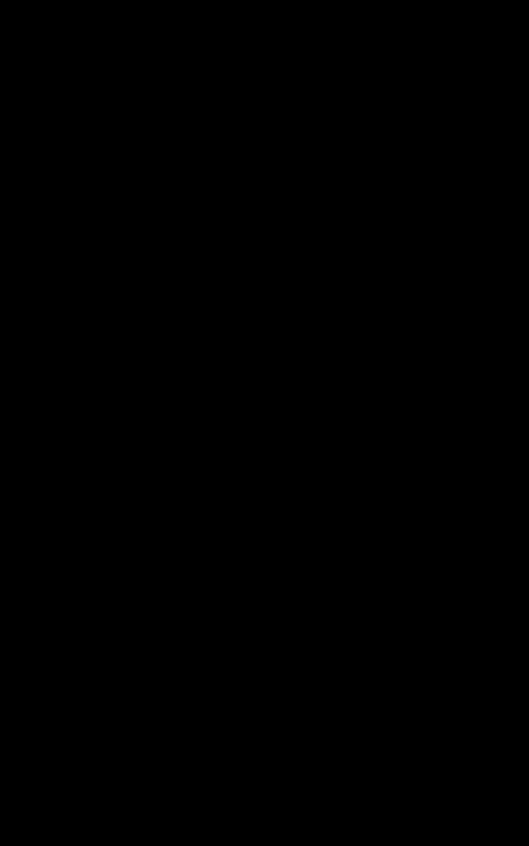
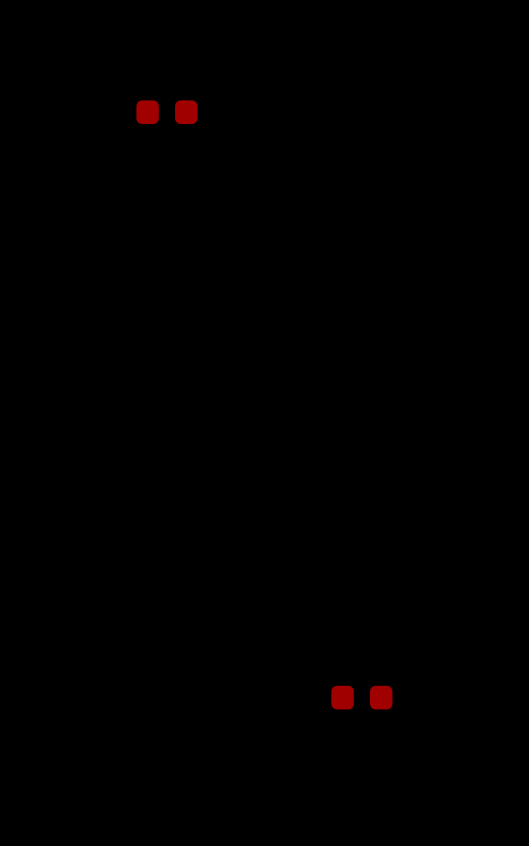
part: none -> (166, 112)
part: none -> (361, 697)

